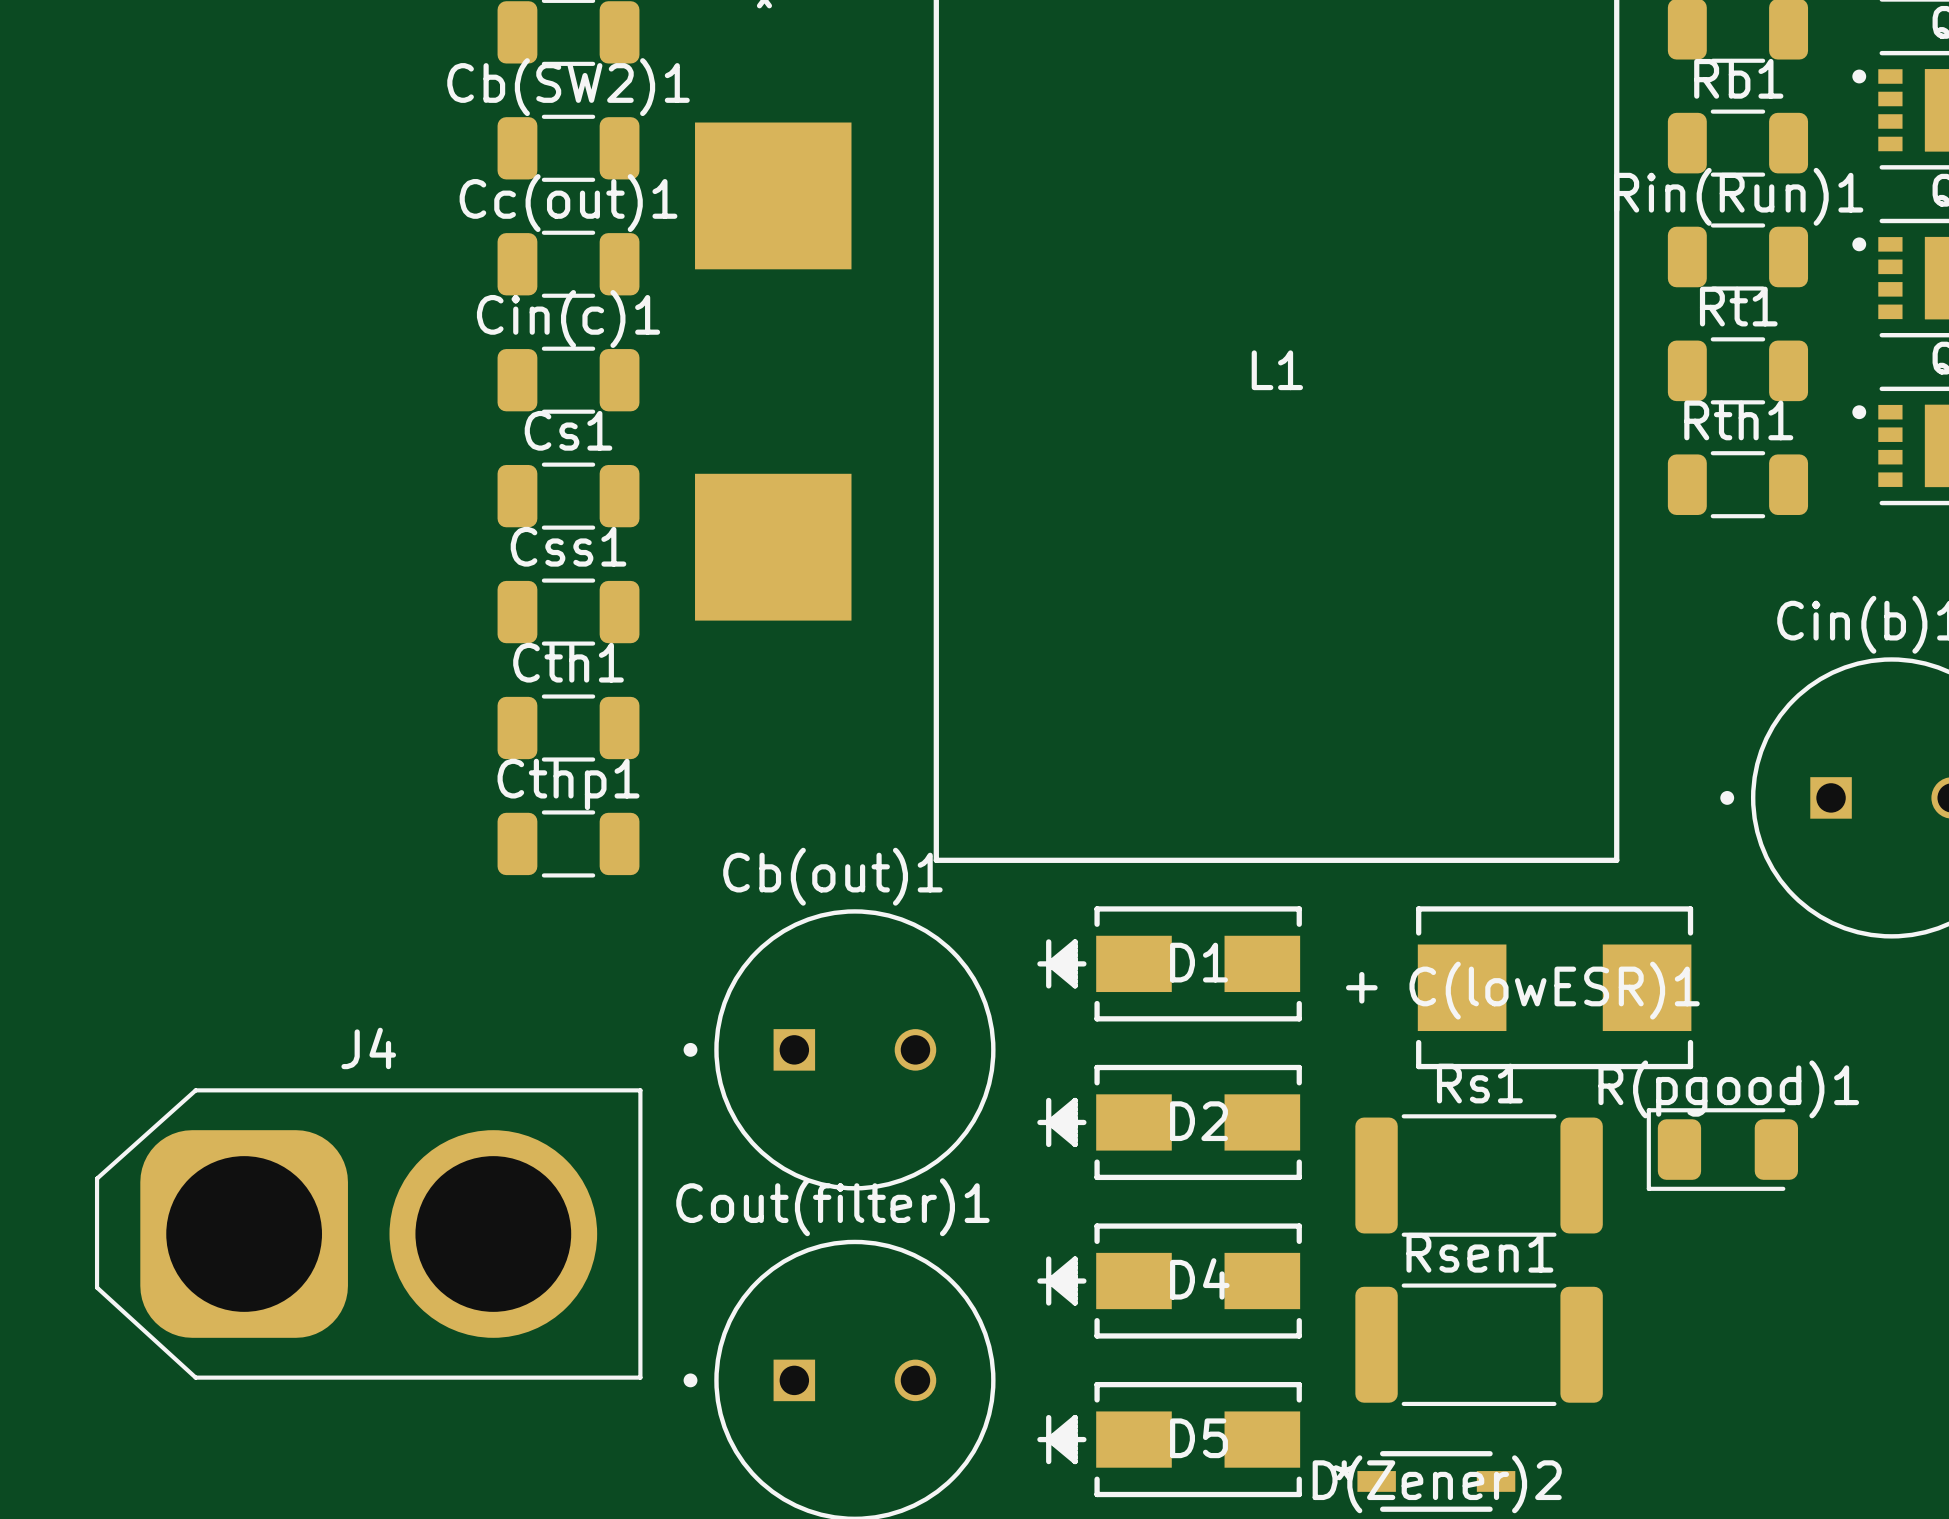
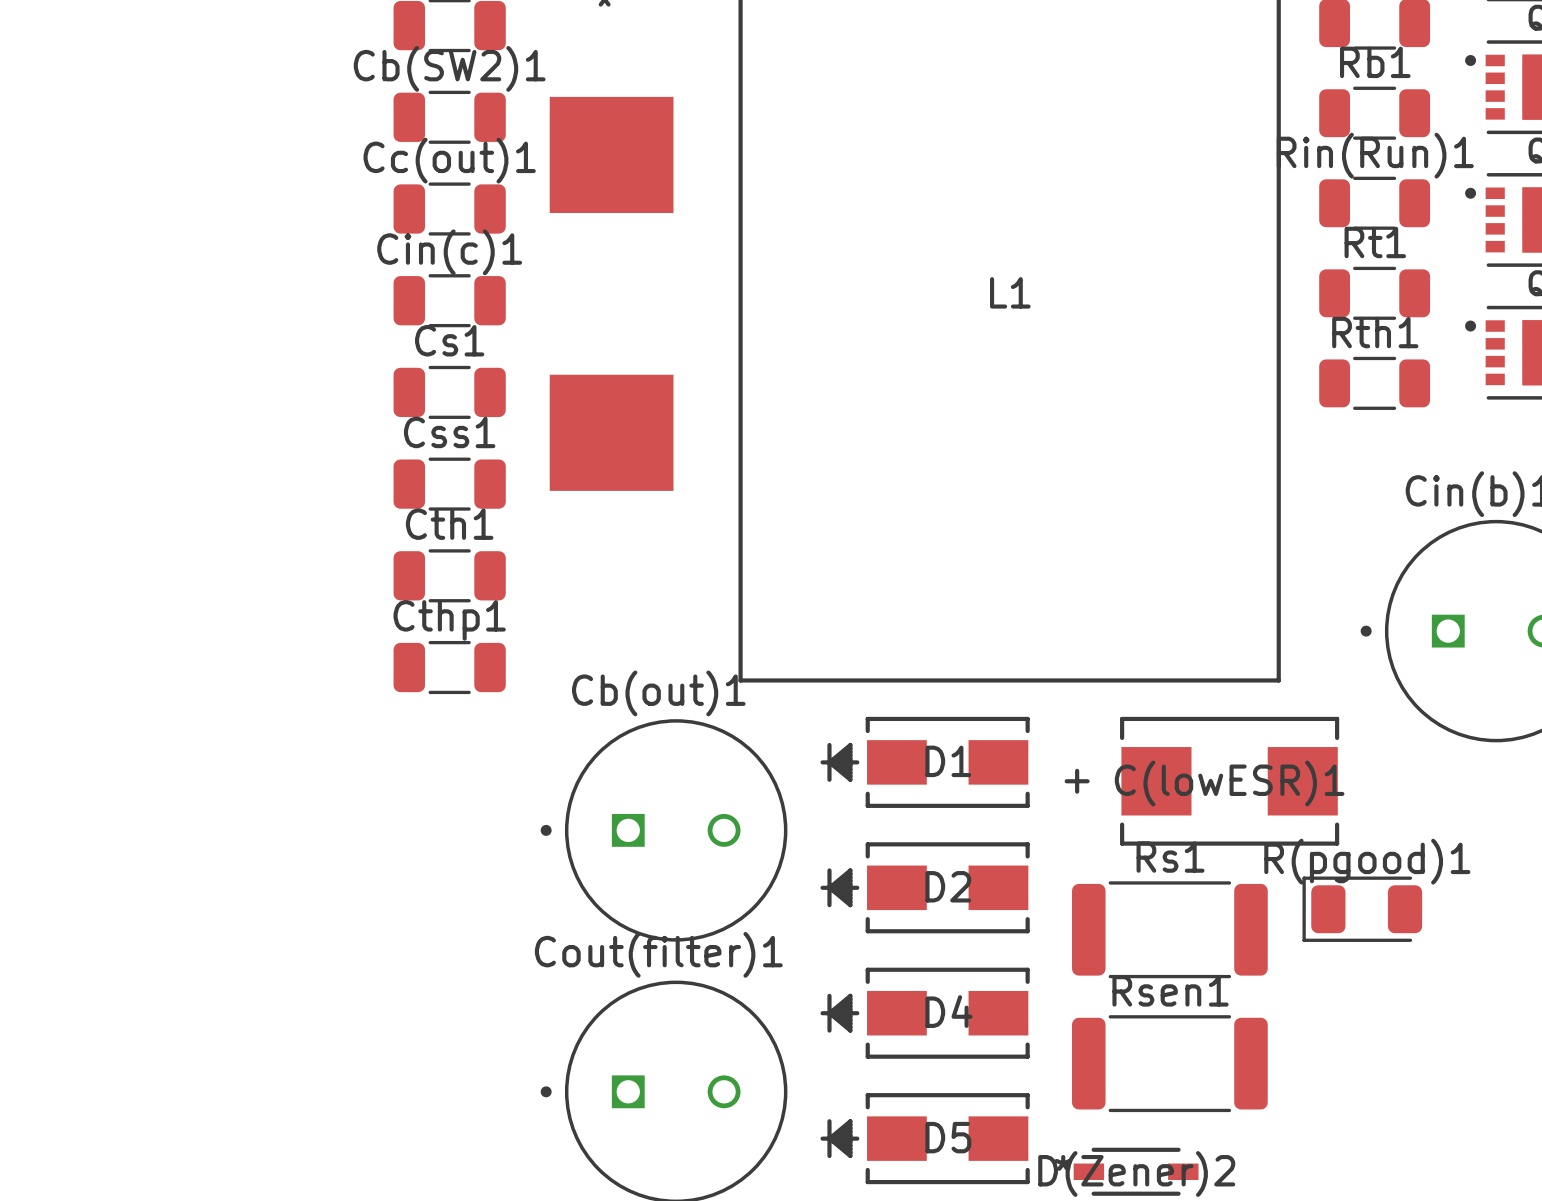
J4: (368, 1233) -> none

